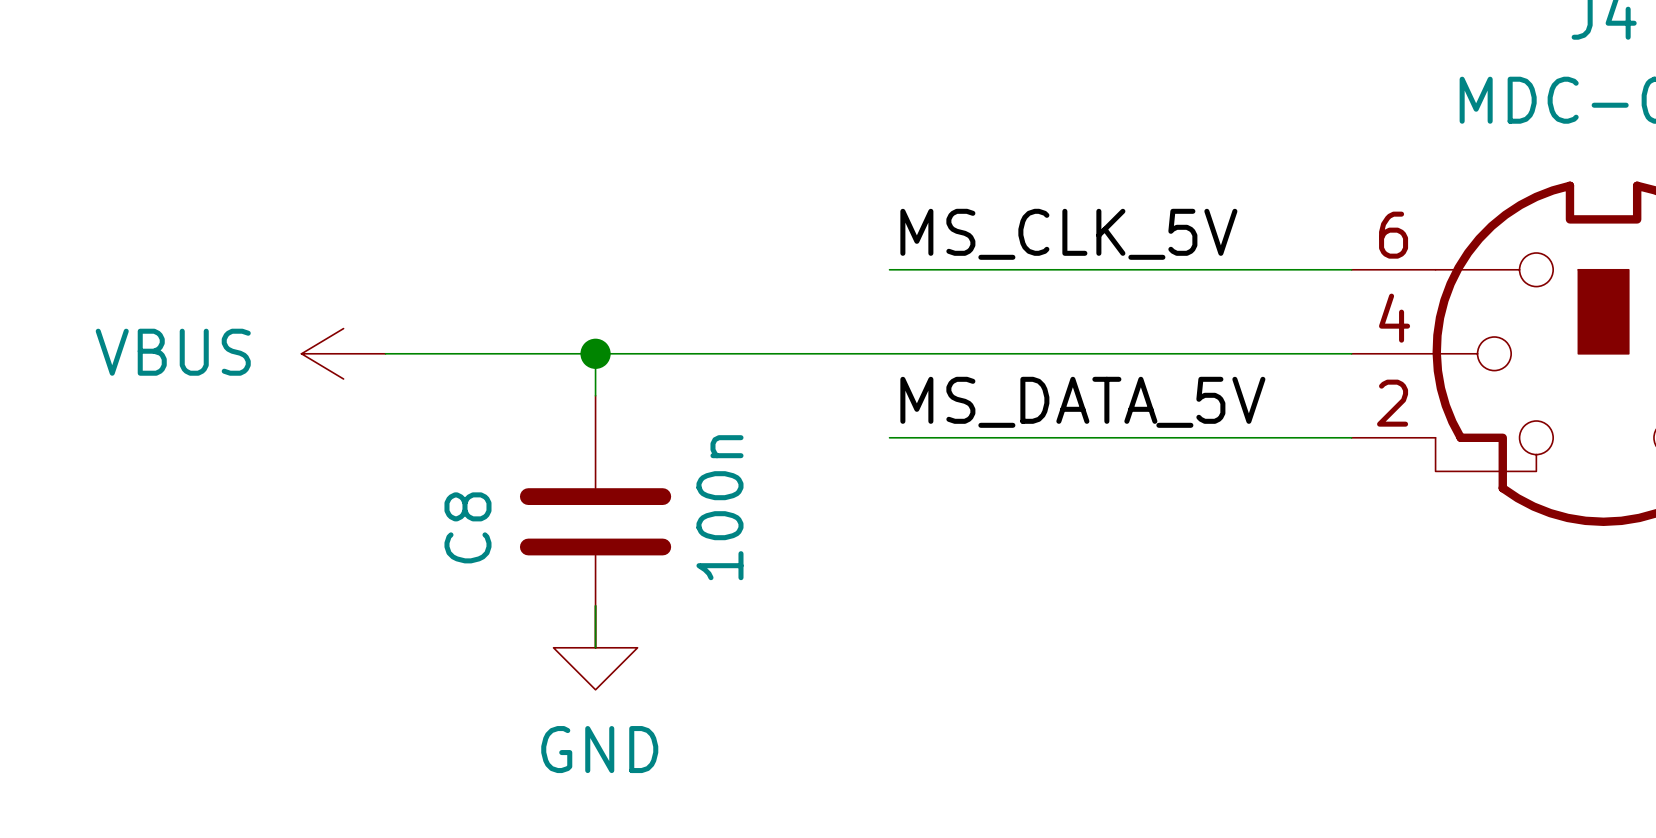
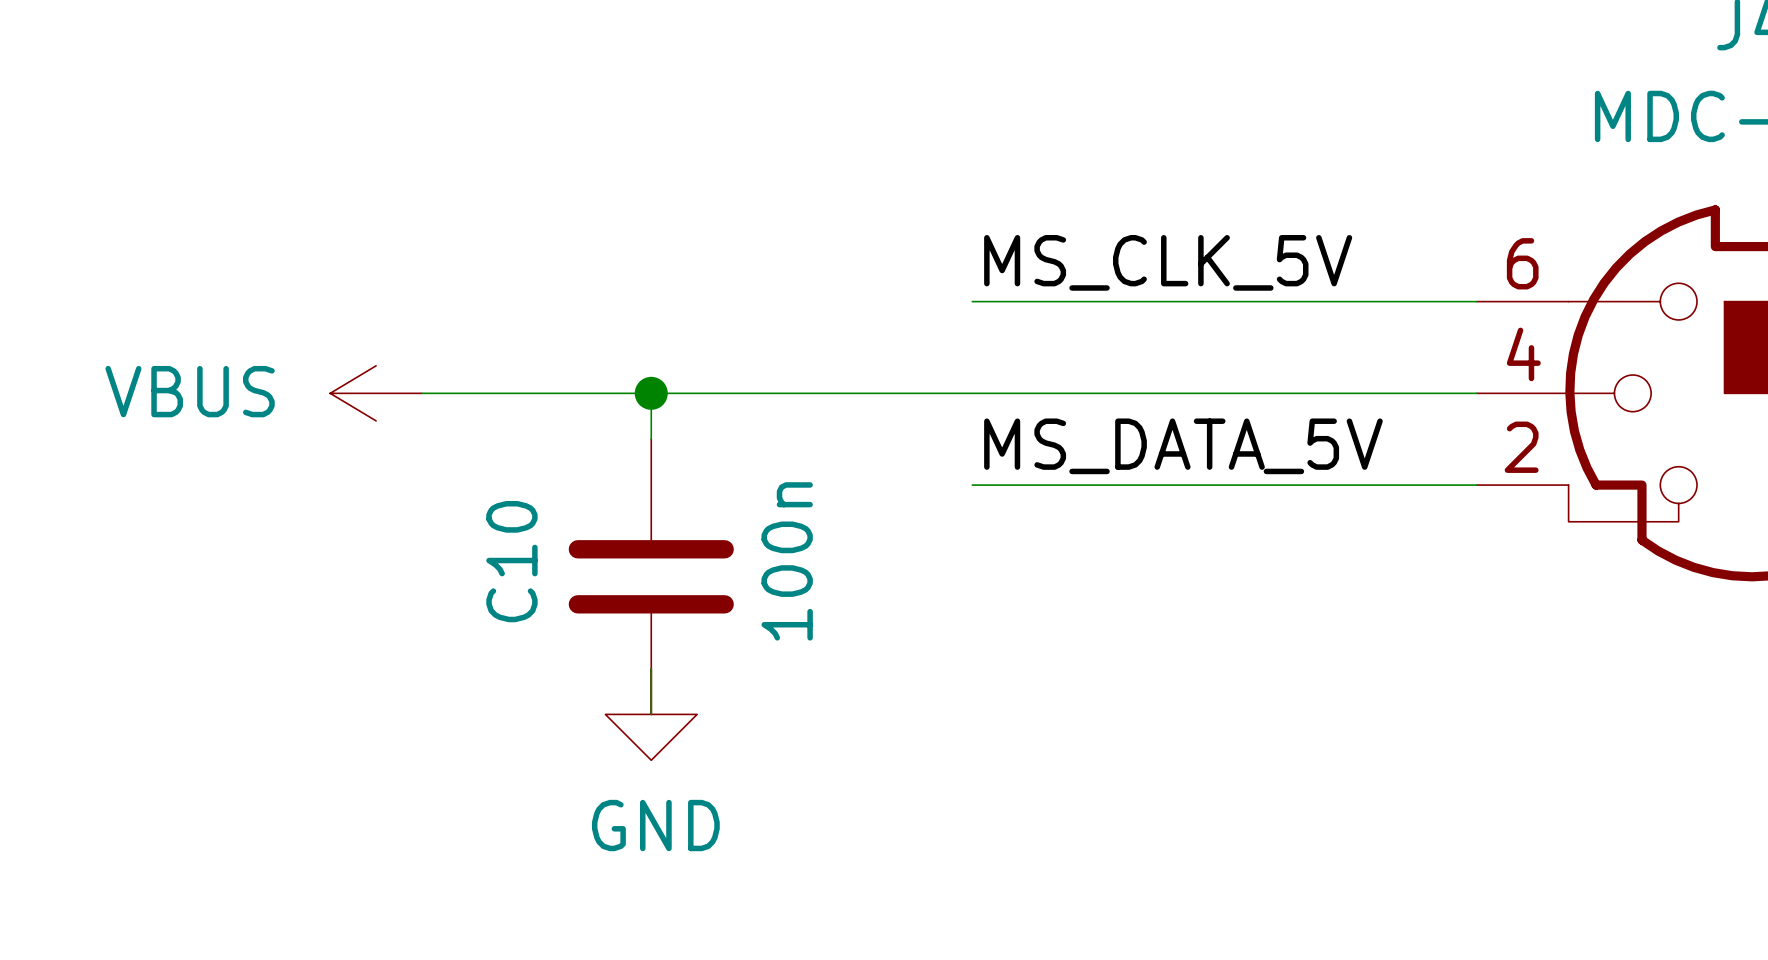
C8 name: C8 (467, 527) -> C10 (511, 561)

